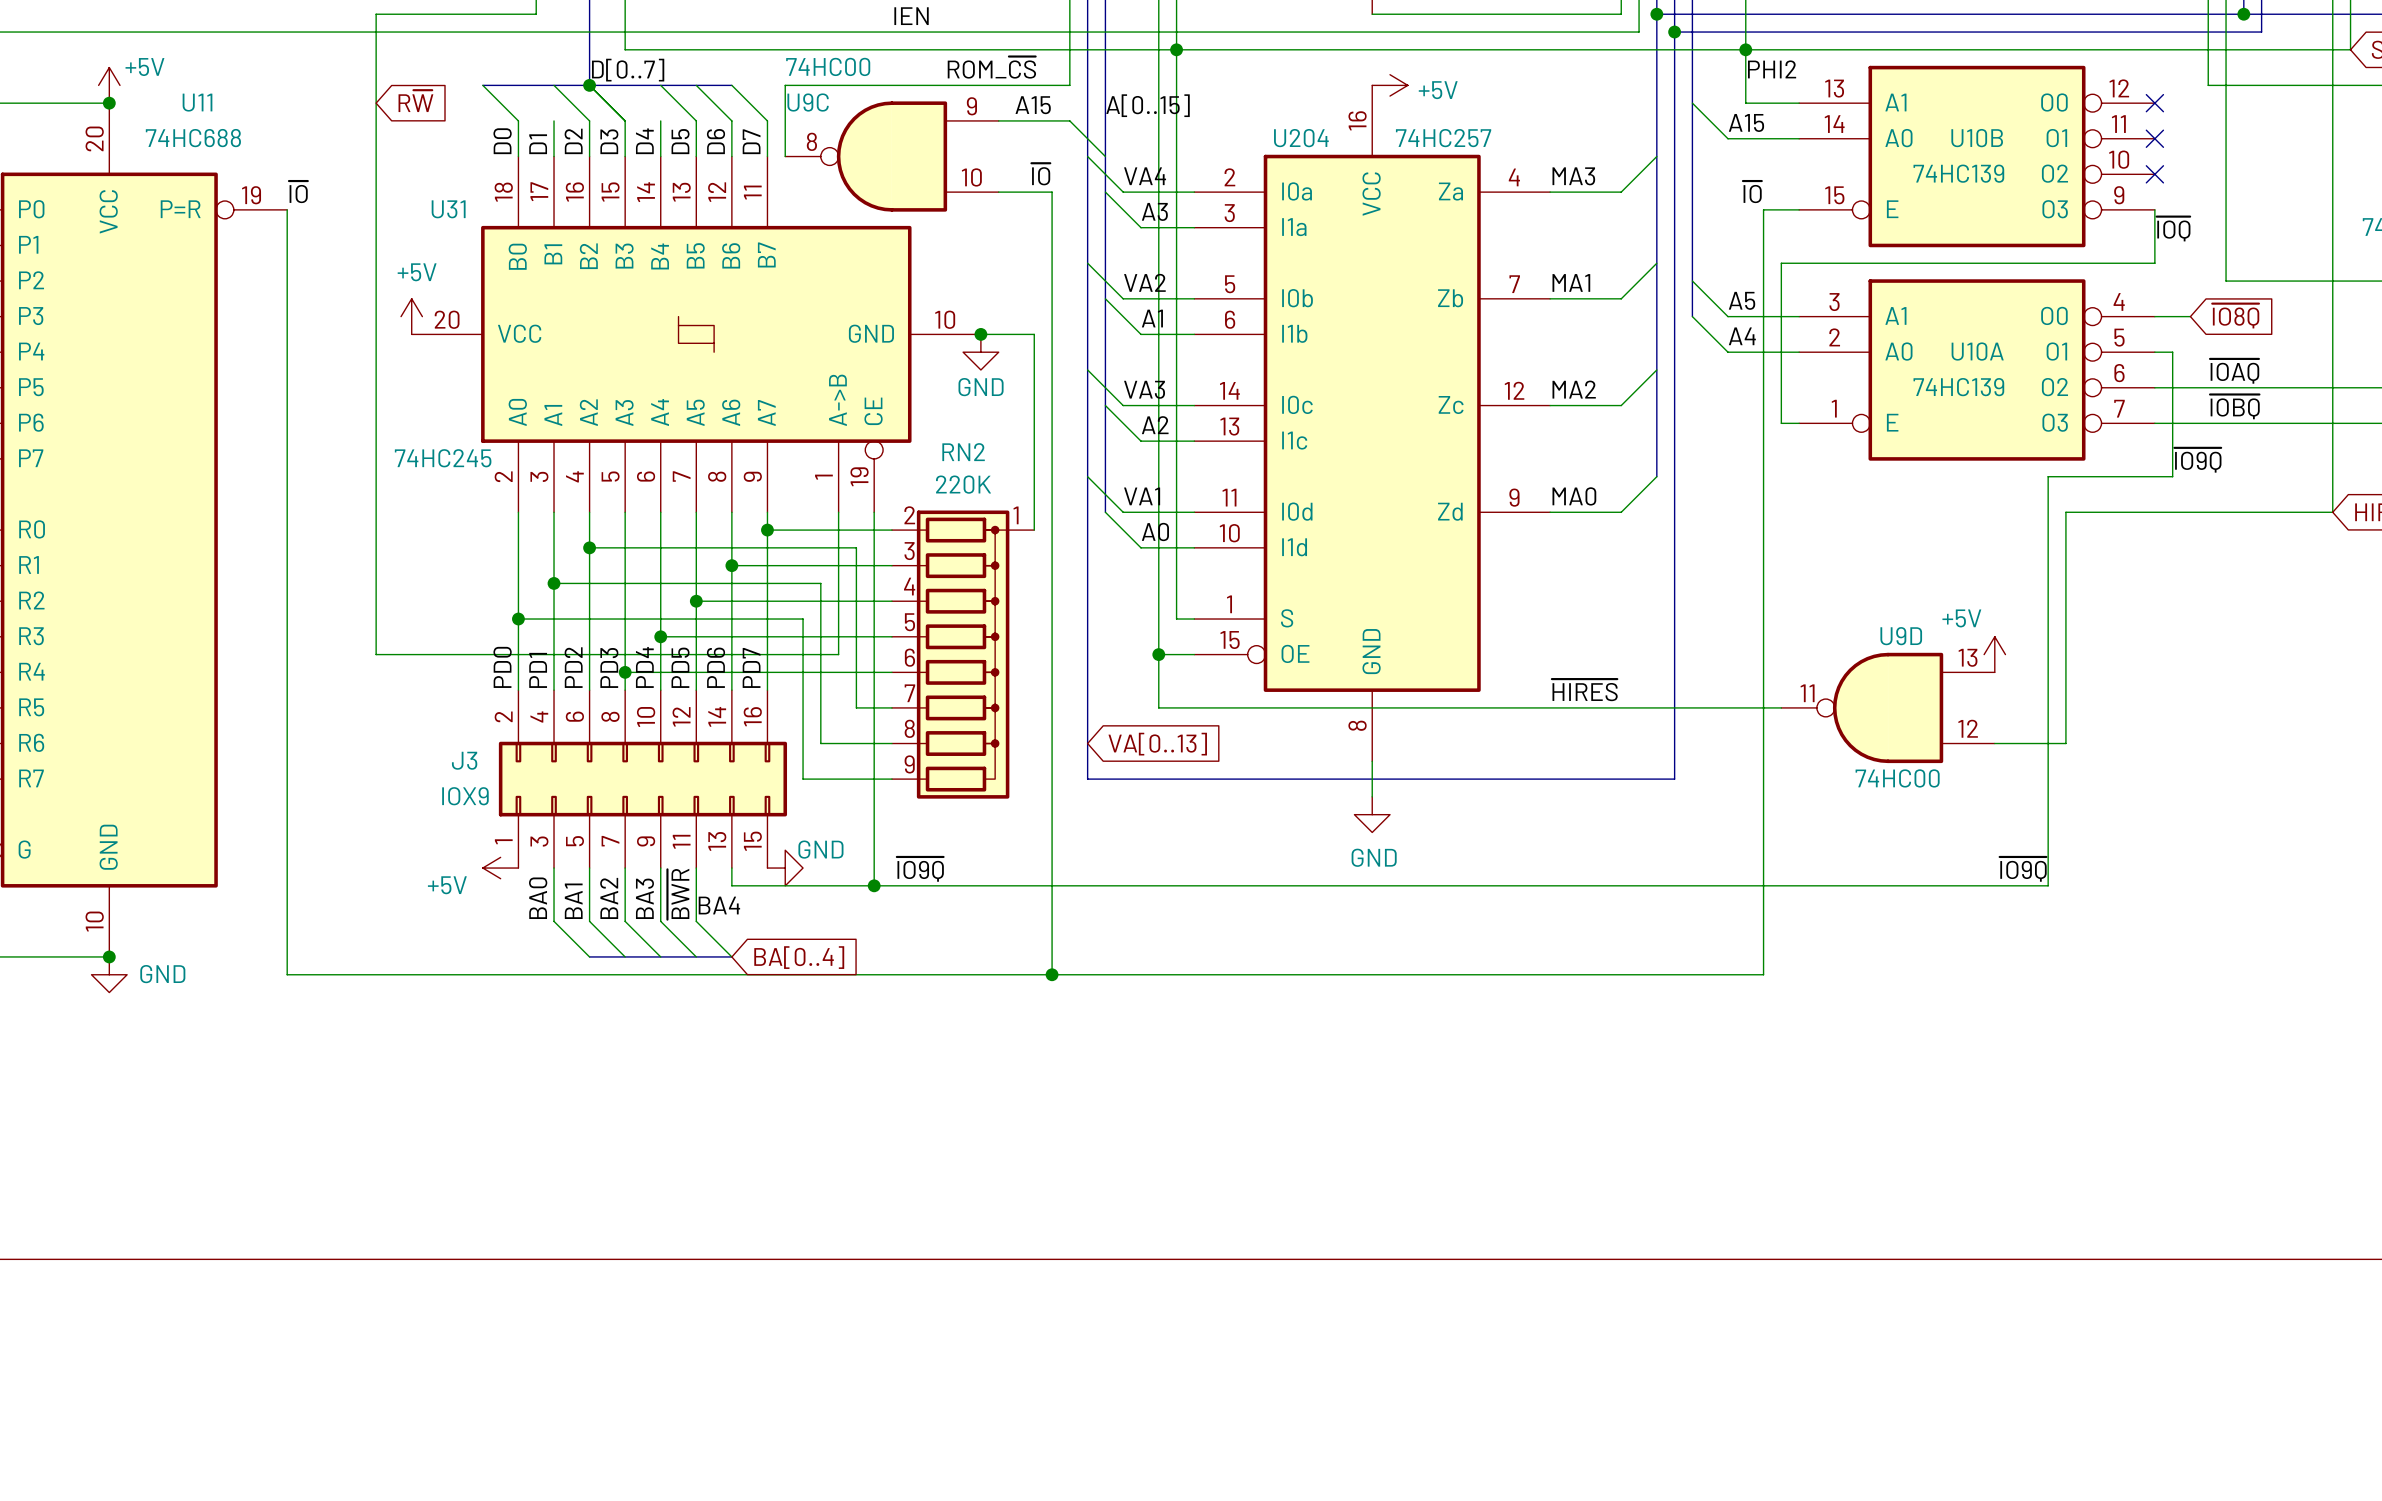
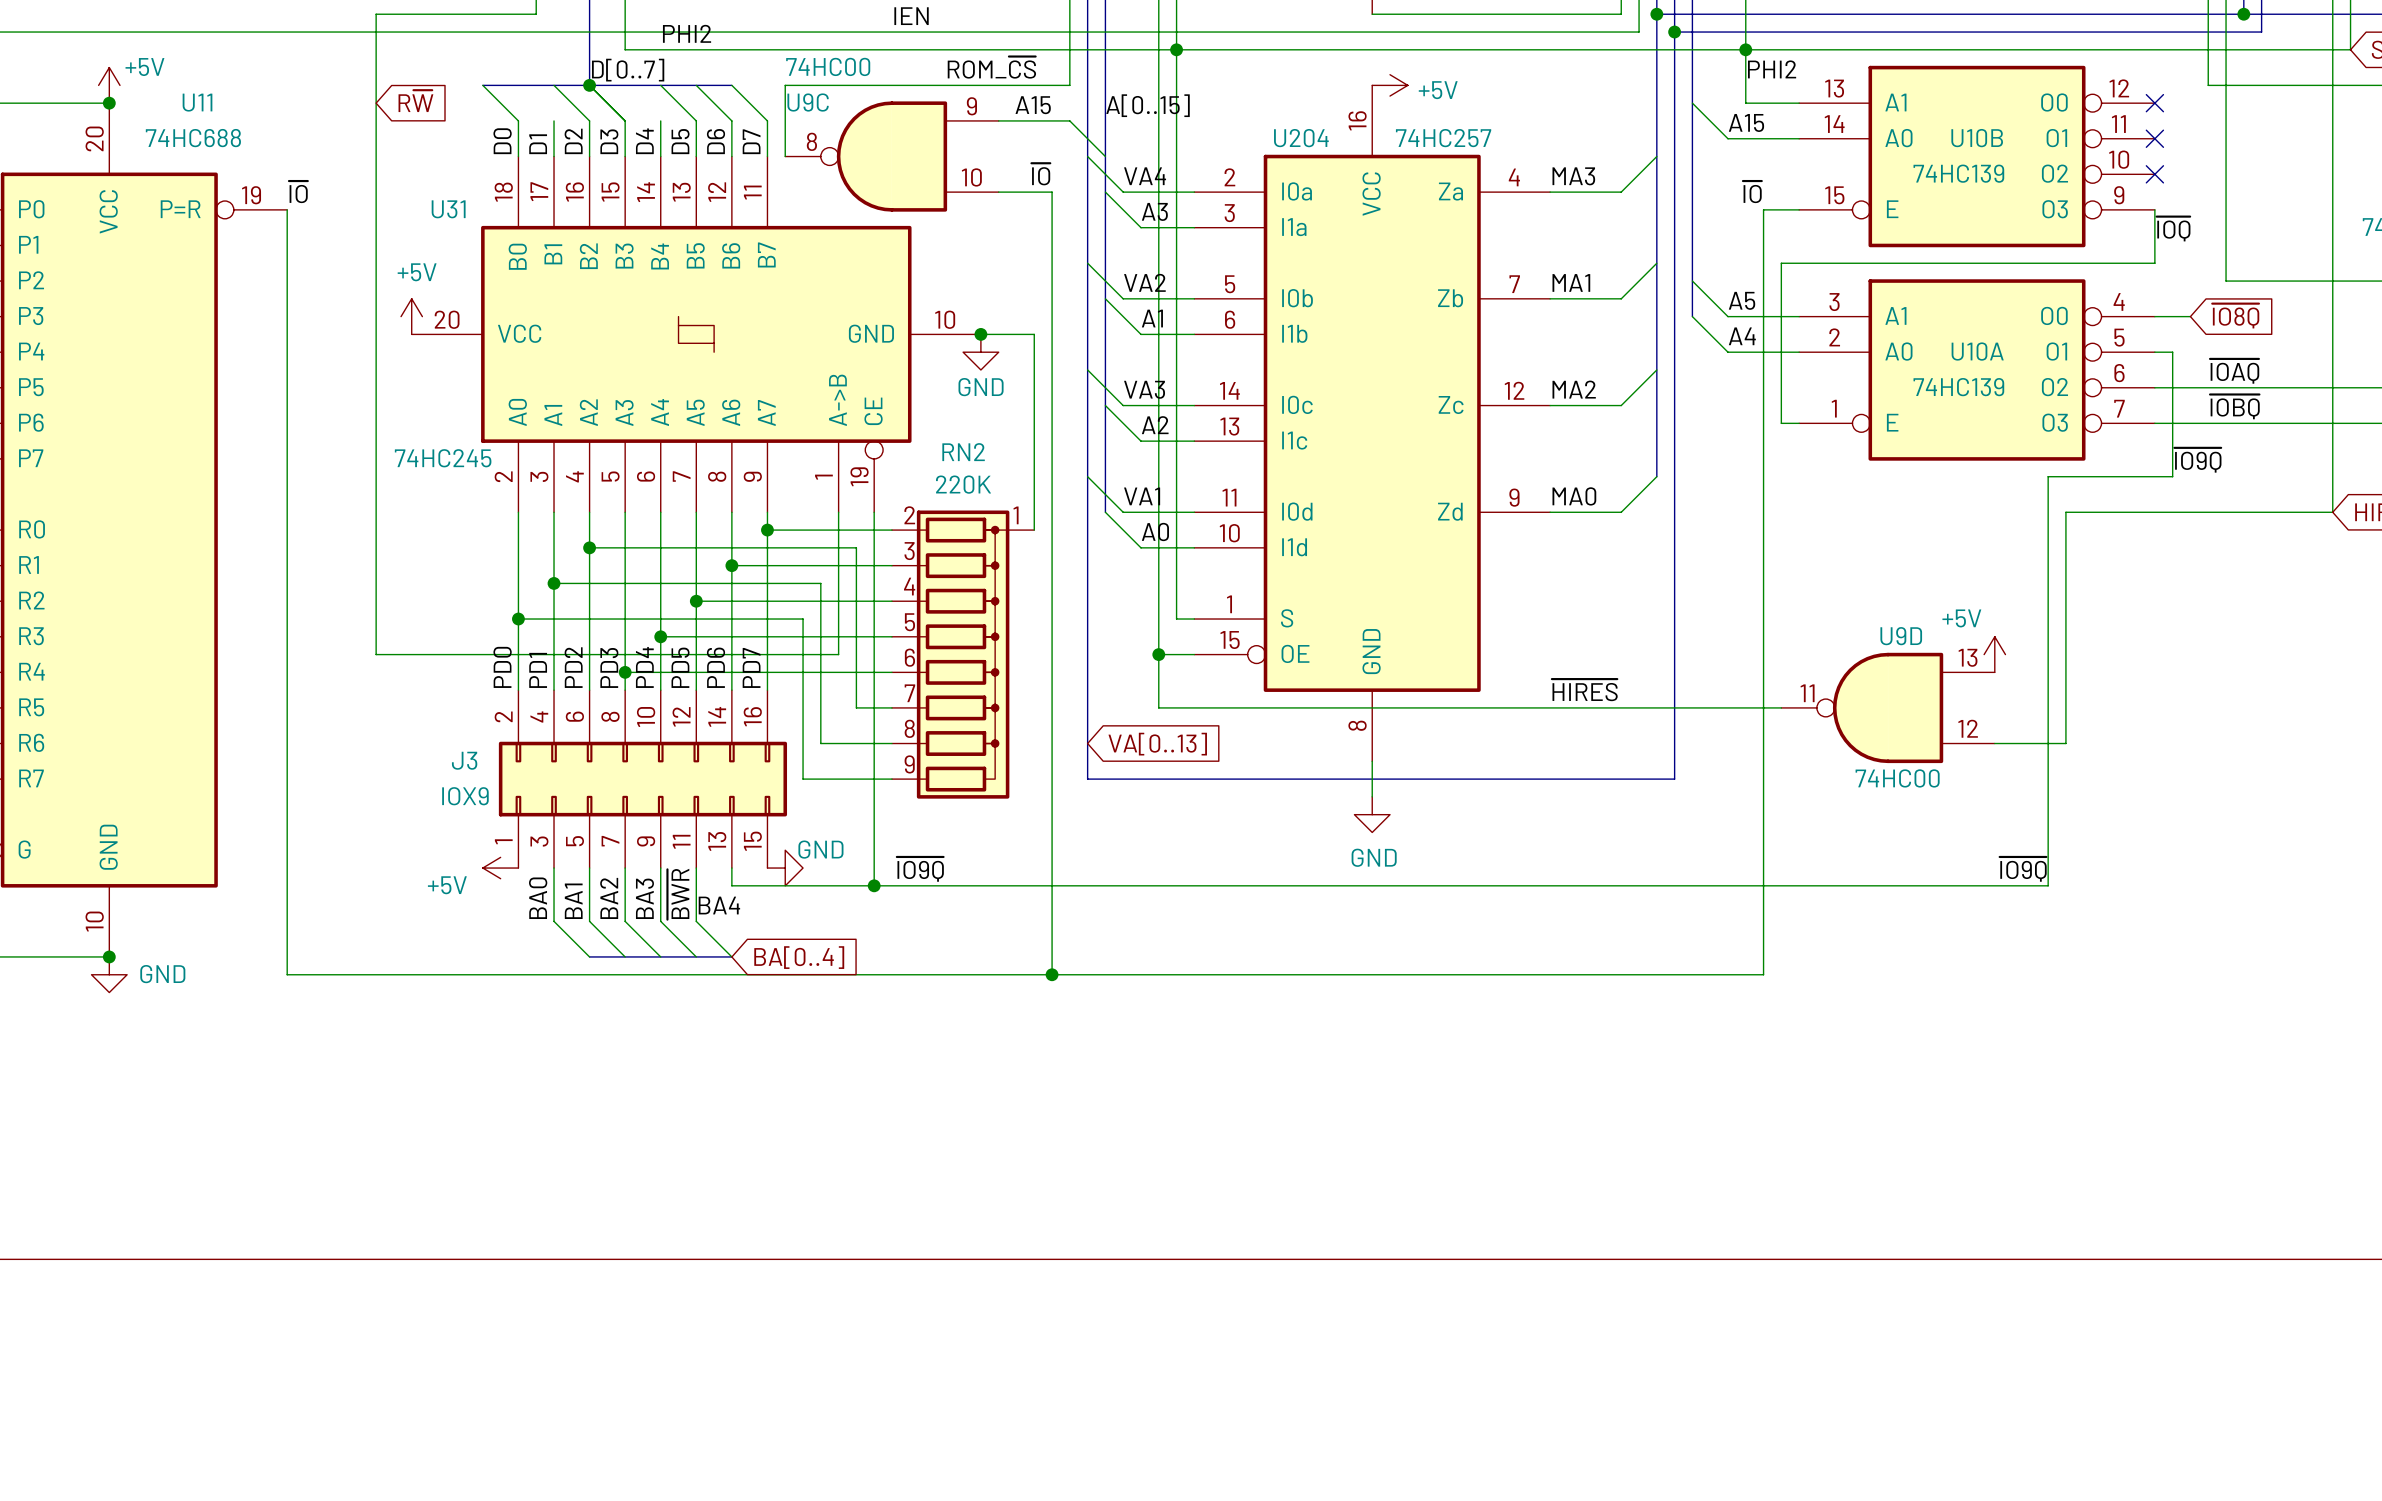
label: none -> PHI2 (687, 33)

